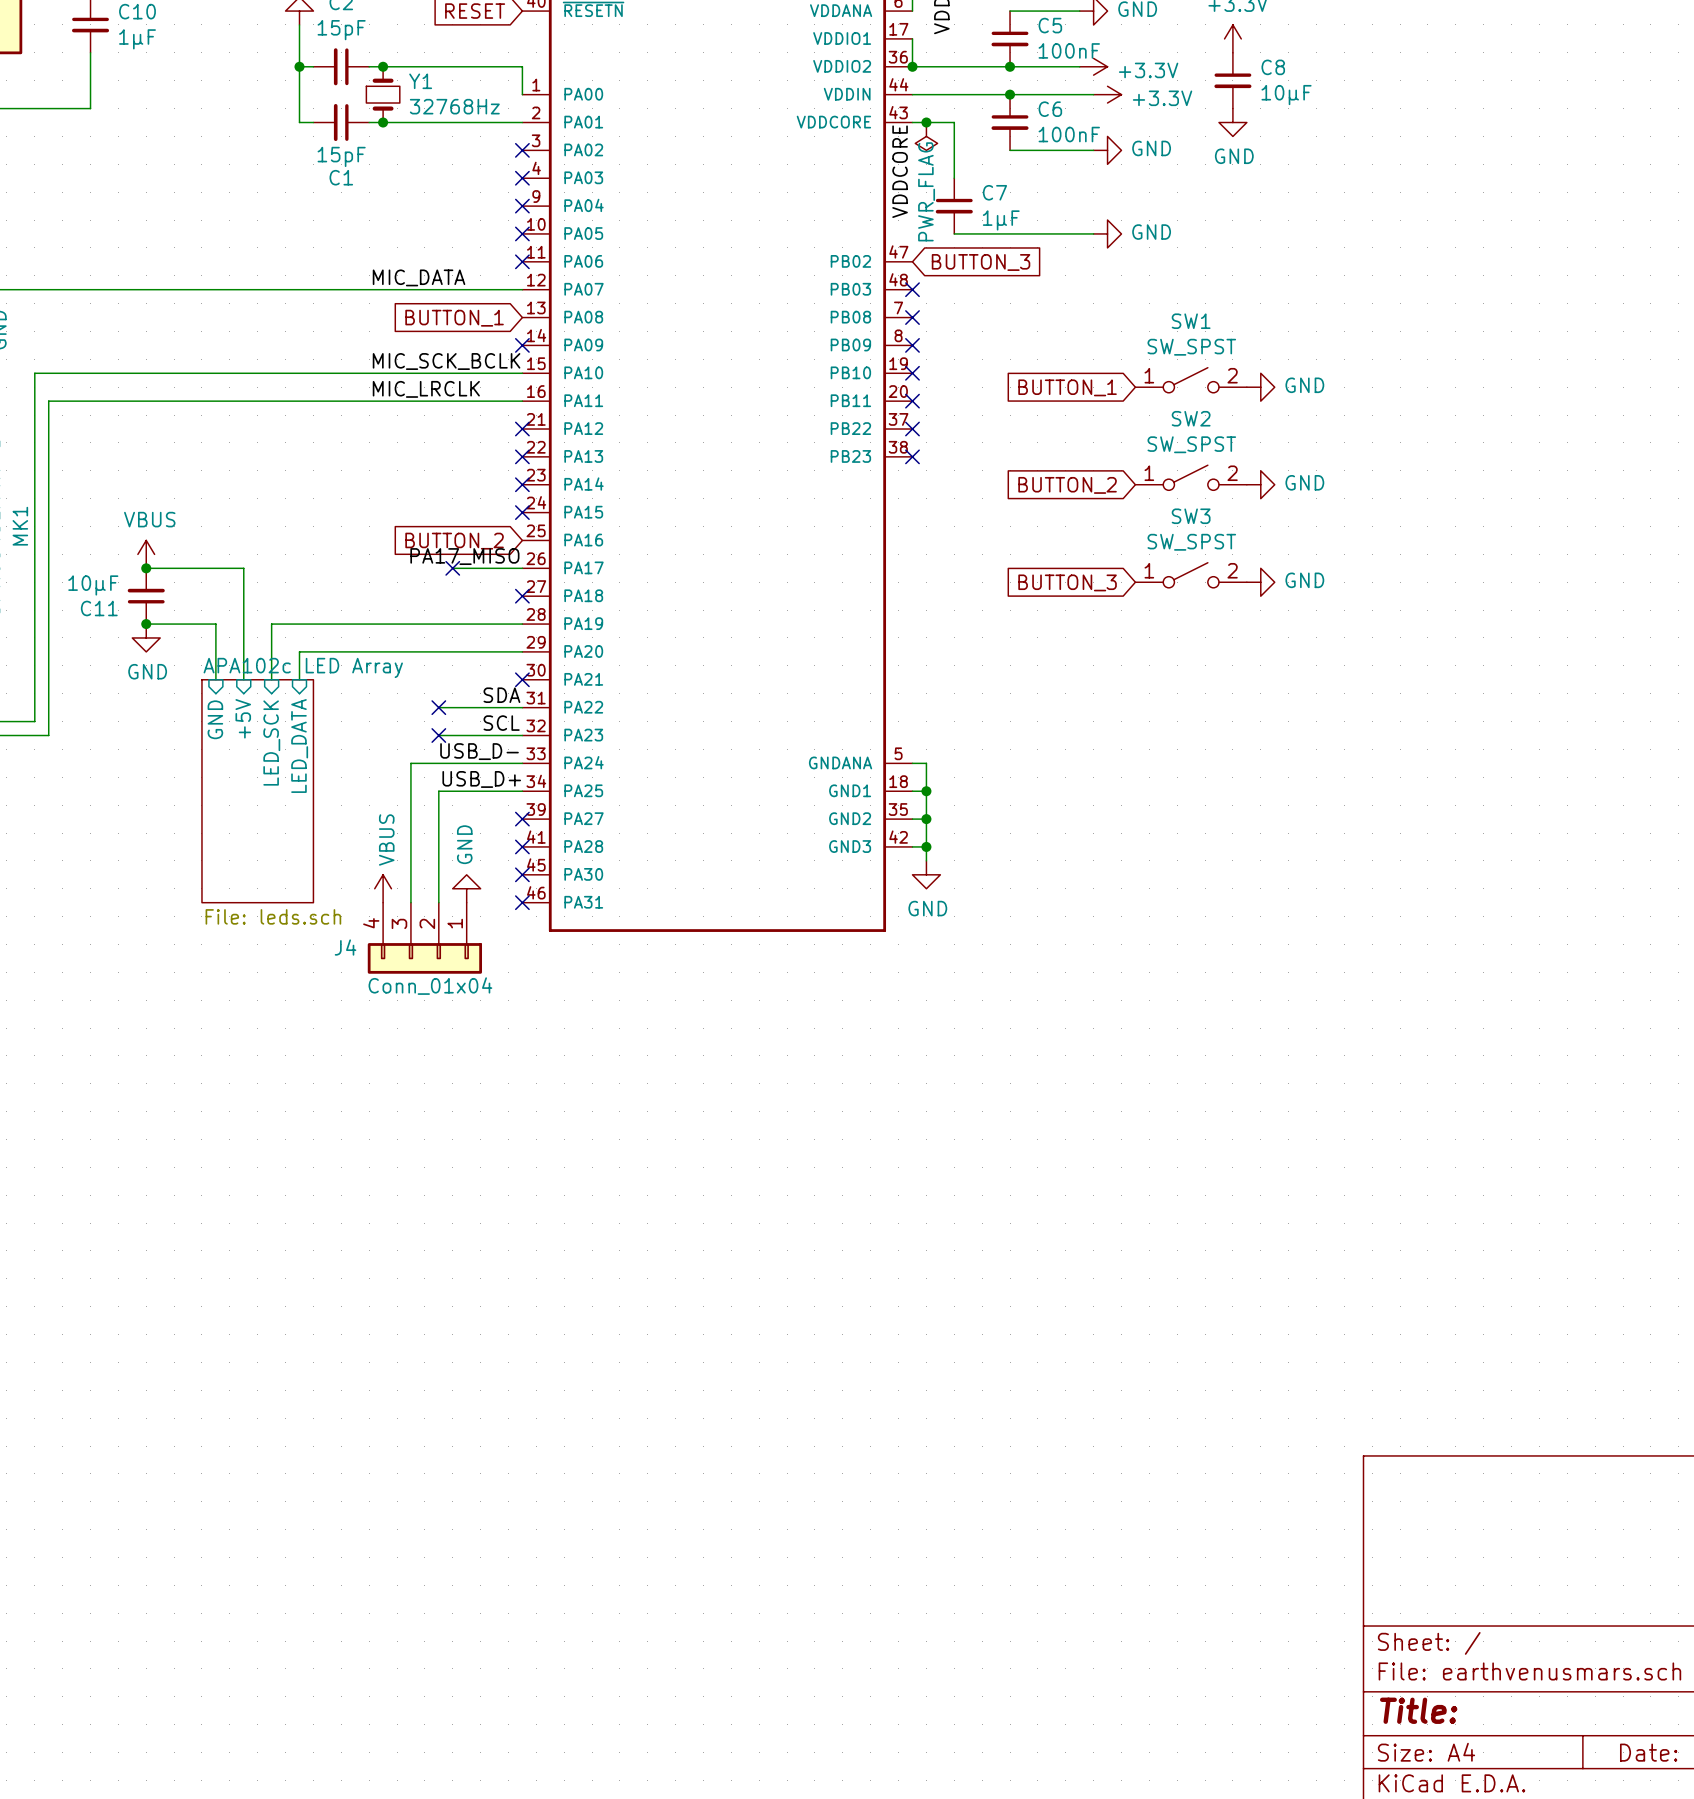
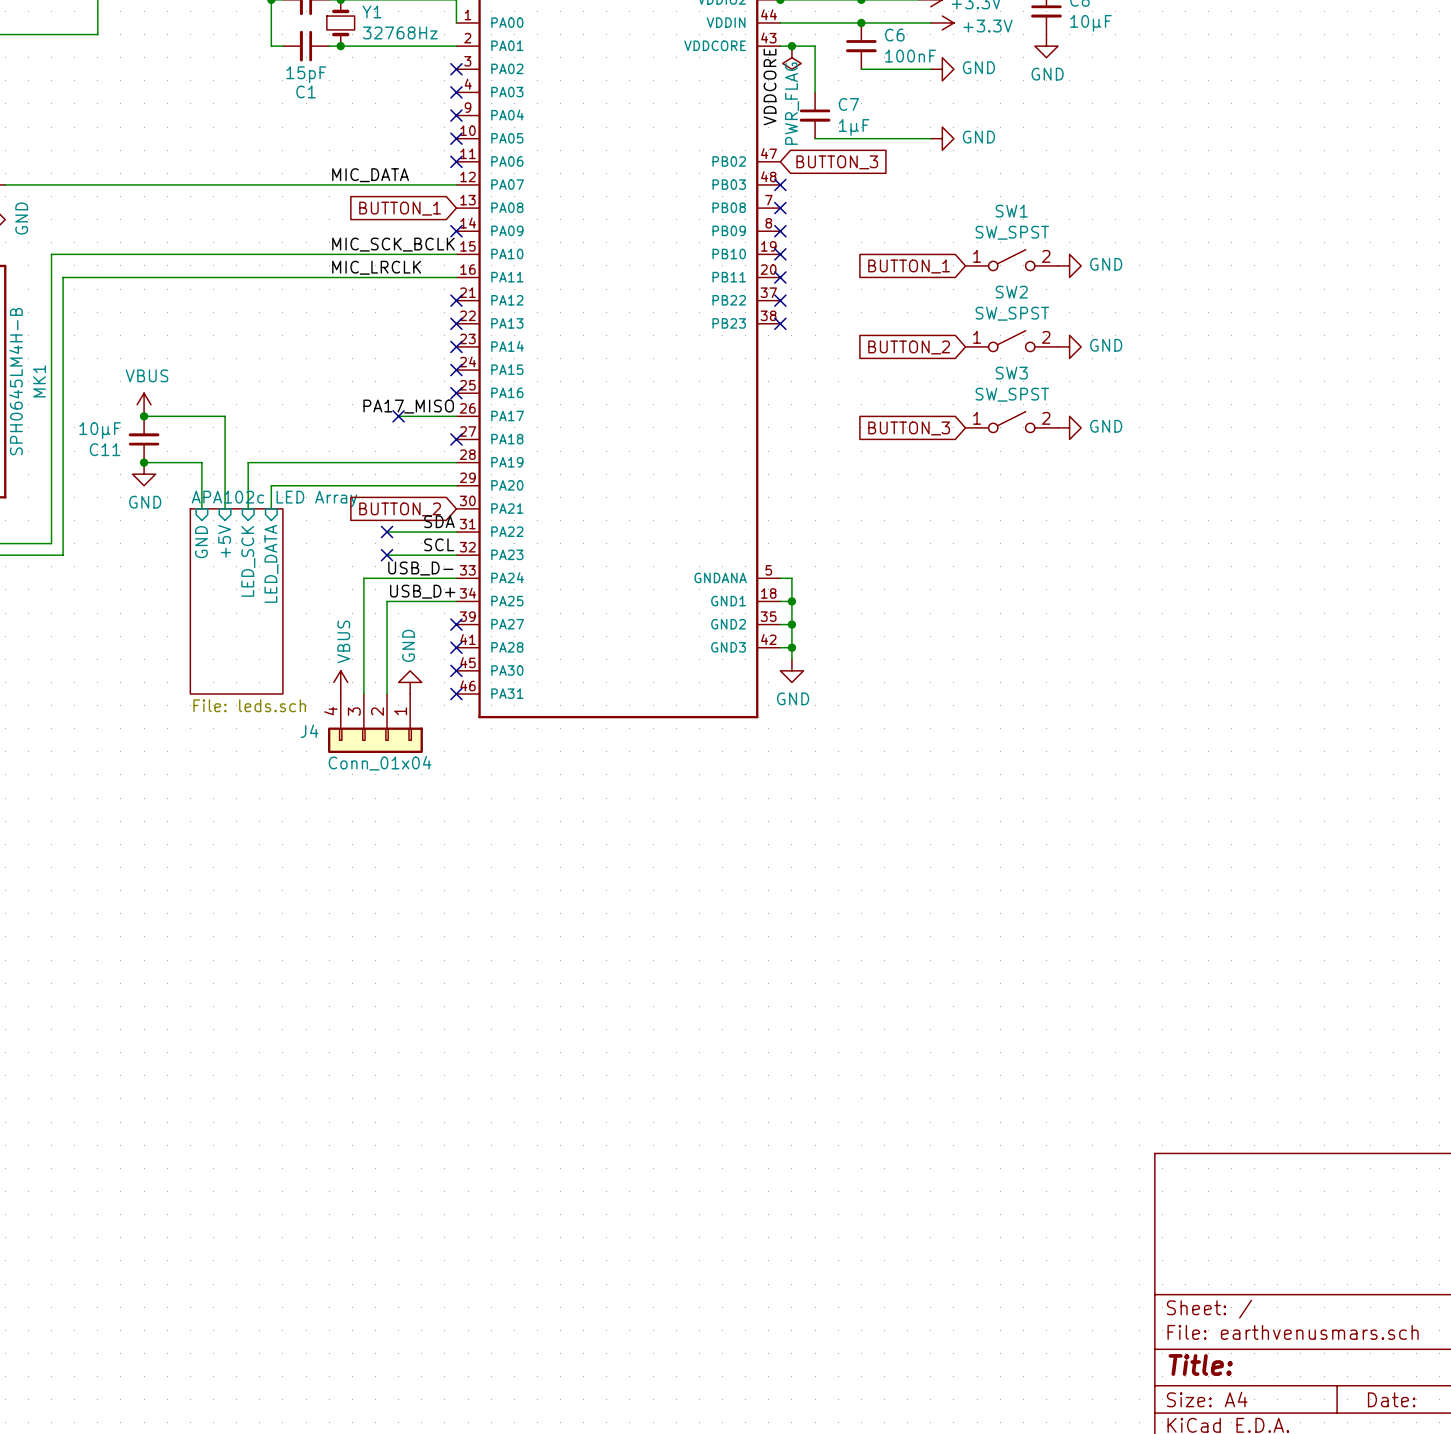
no-connect mark: none -> (456, 393)
global label position: BUTTON_2 (454, 541) -> BUTTON_2 (400, 509)
no-connect mark: (522, 679) -> none

